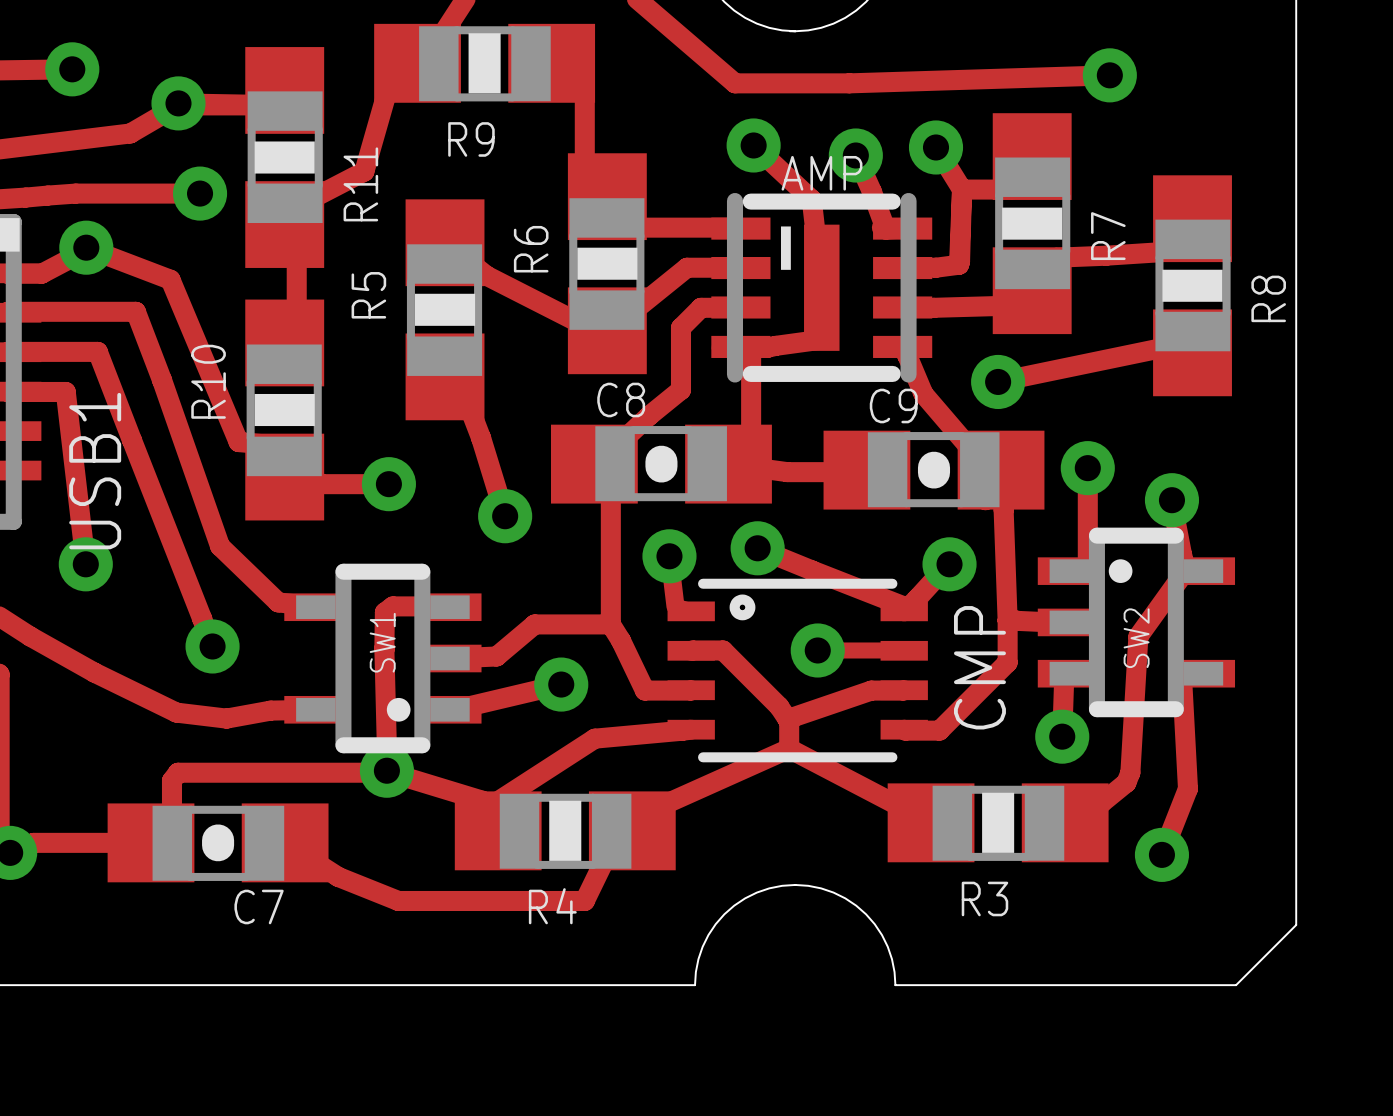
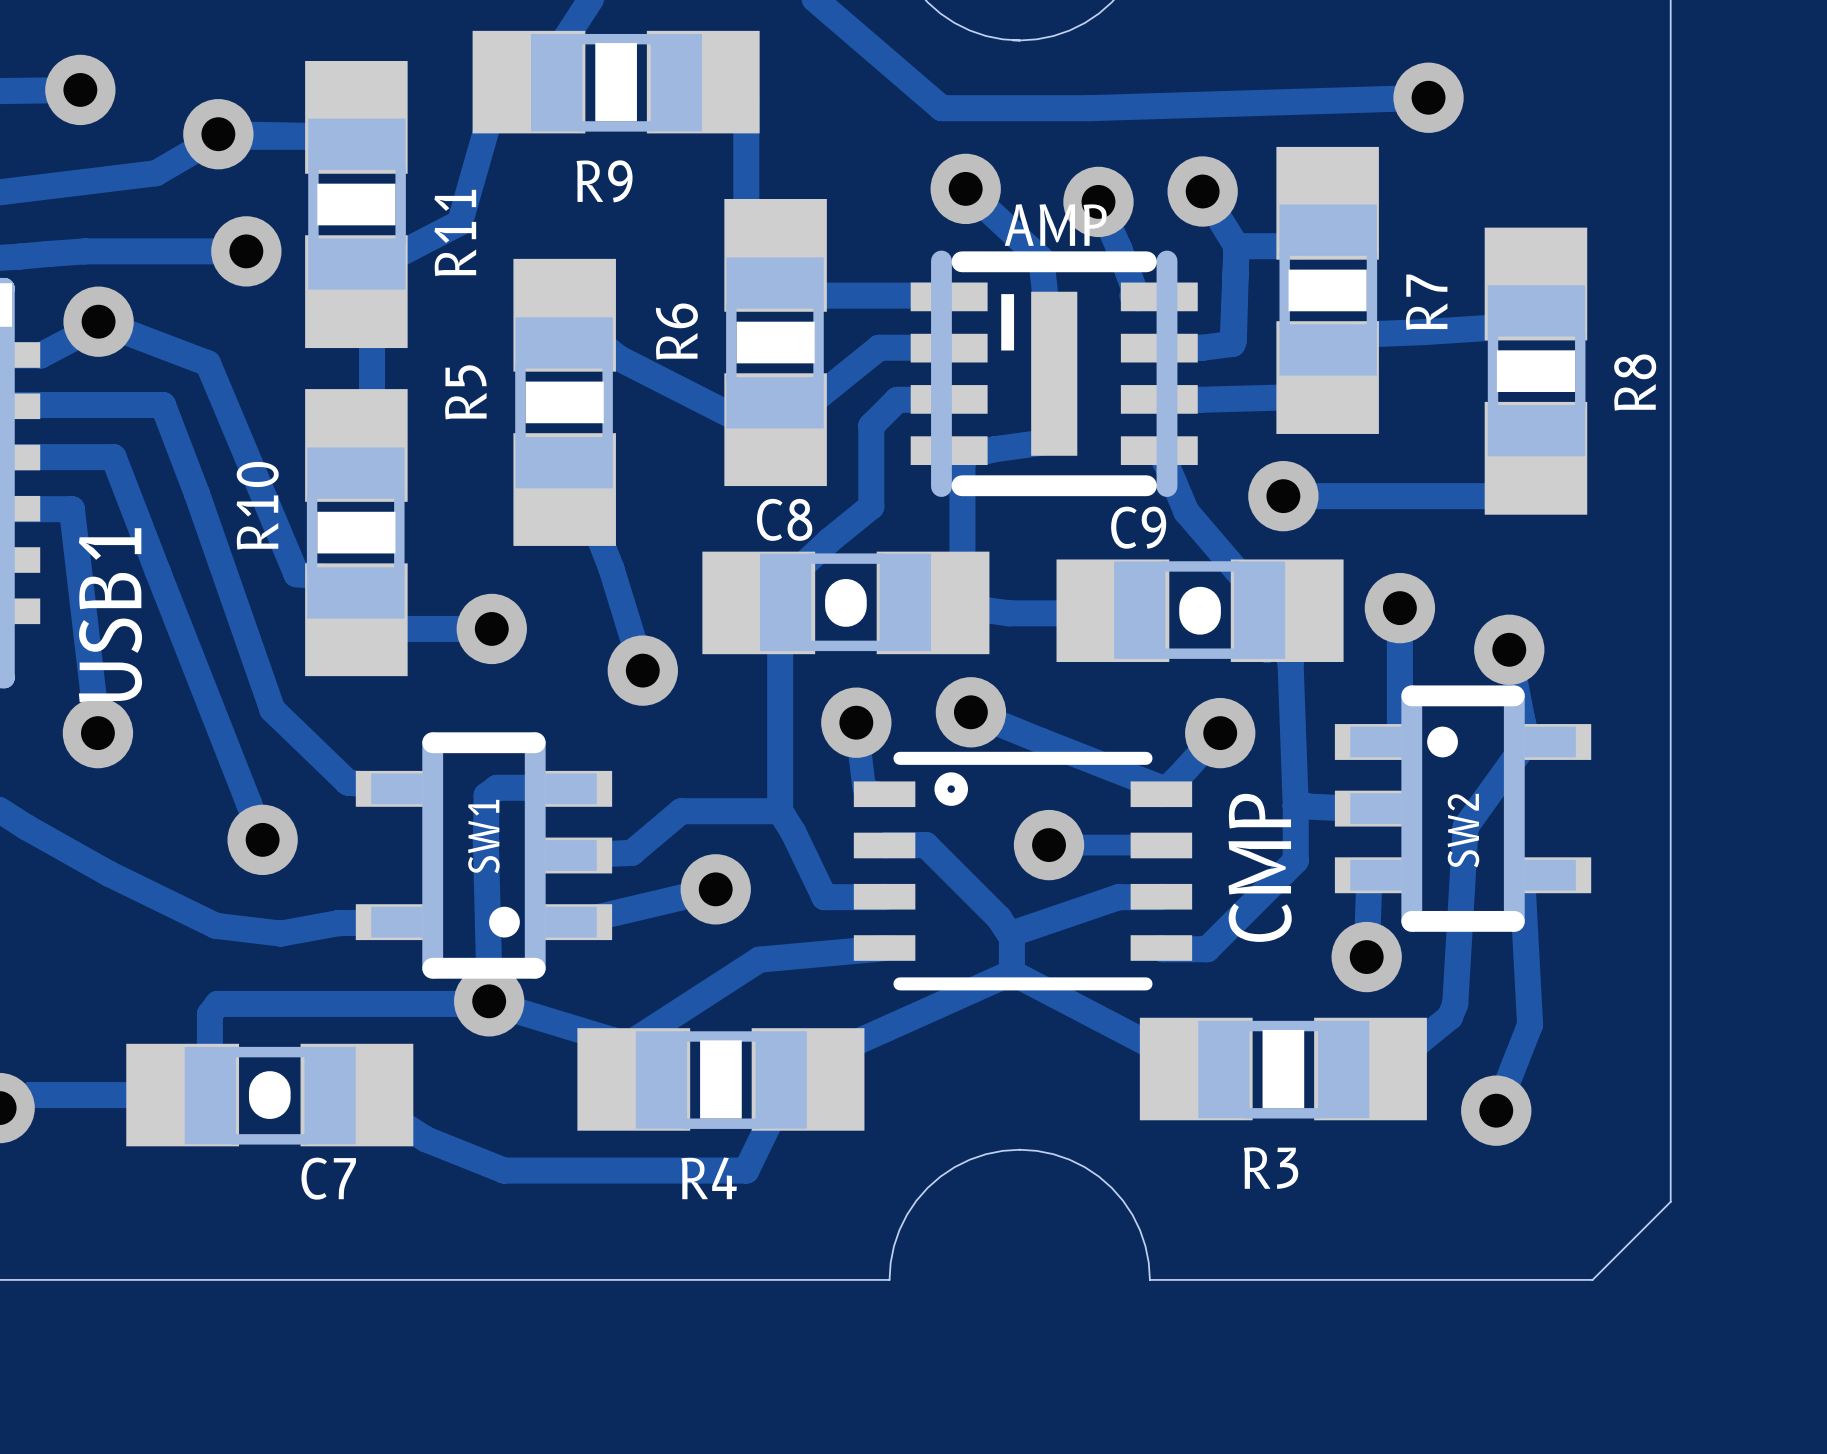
track: (1192, 352) (1172, 345) (998, 381) -> (1535, 458) (1515, 496) (1283, 496)

